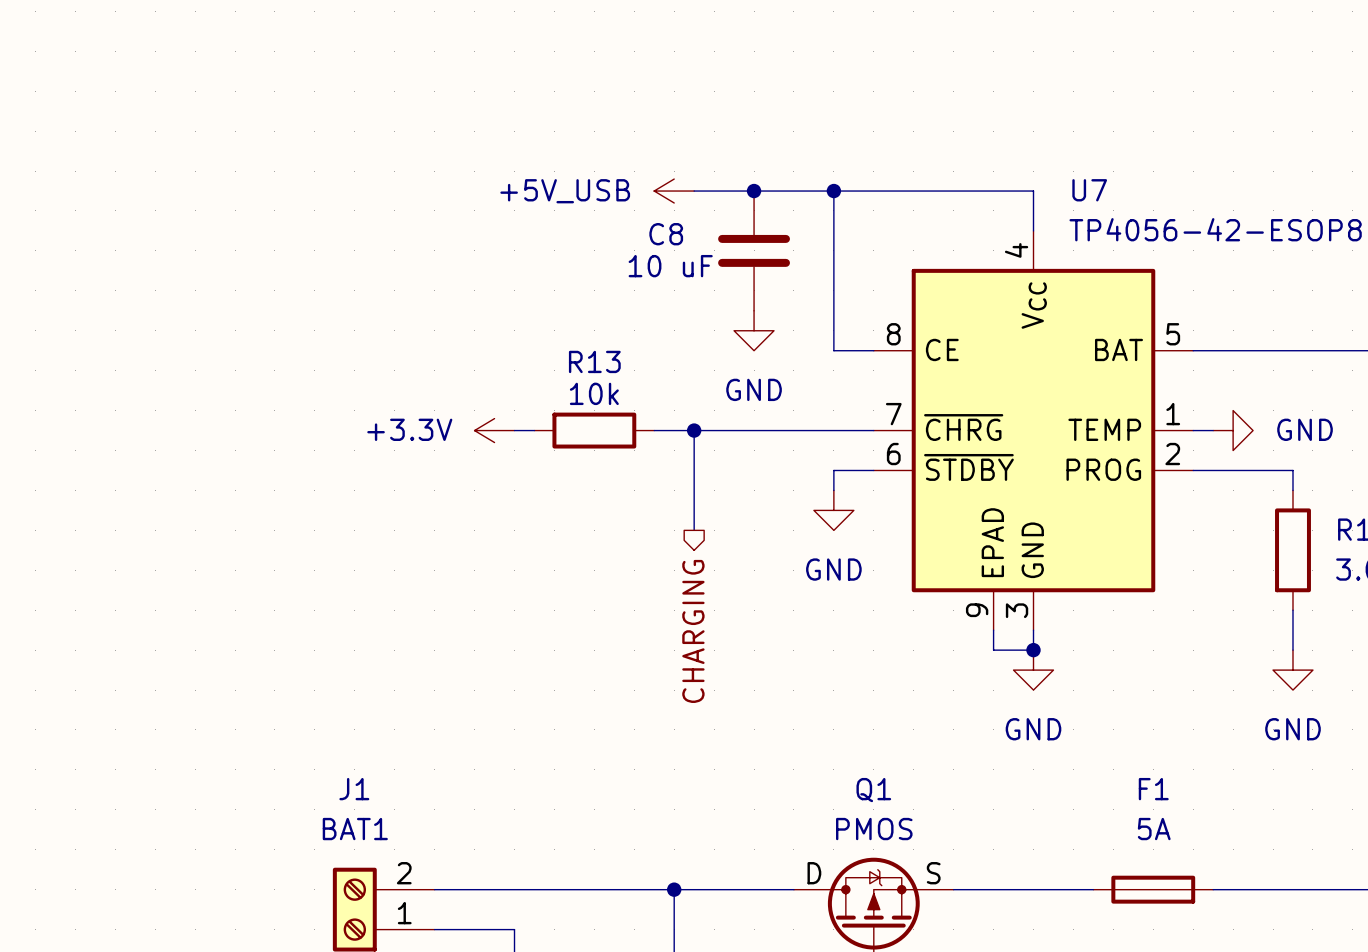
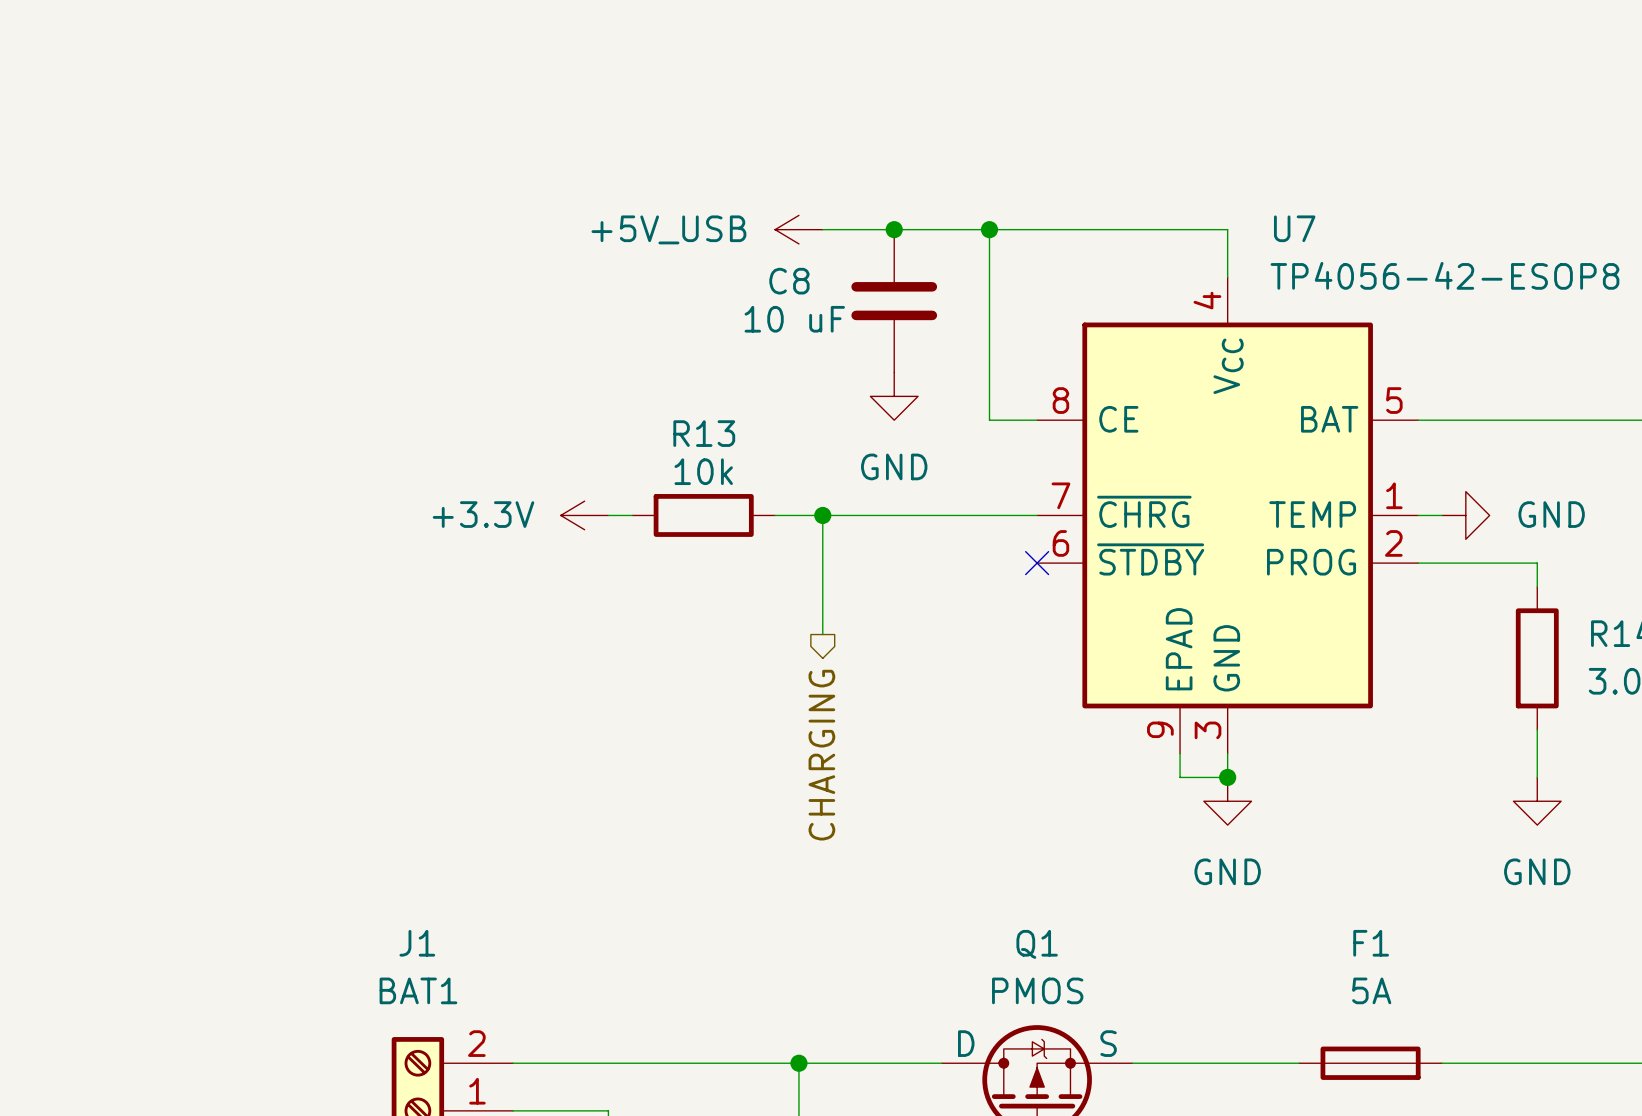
wire: (873, 470) (833, 470) (833, 490) -> none
no-connect mark: none -> (1037, 563)
power symbol: GND (833, 510) -> none

